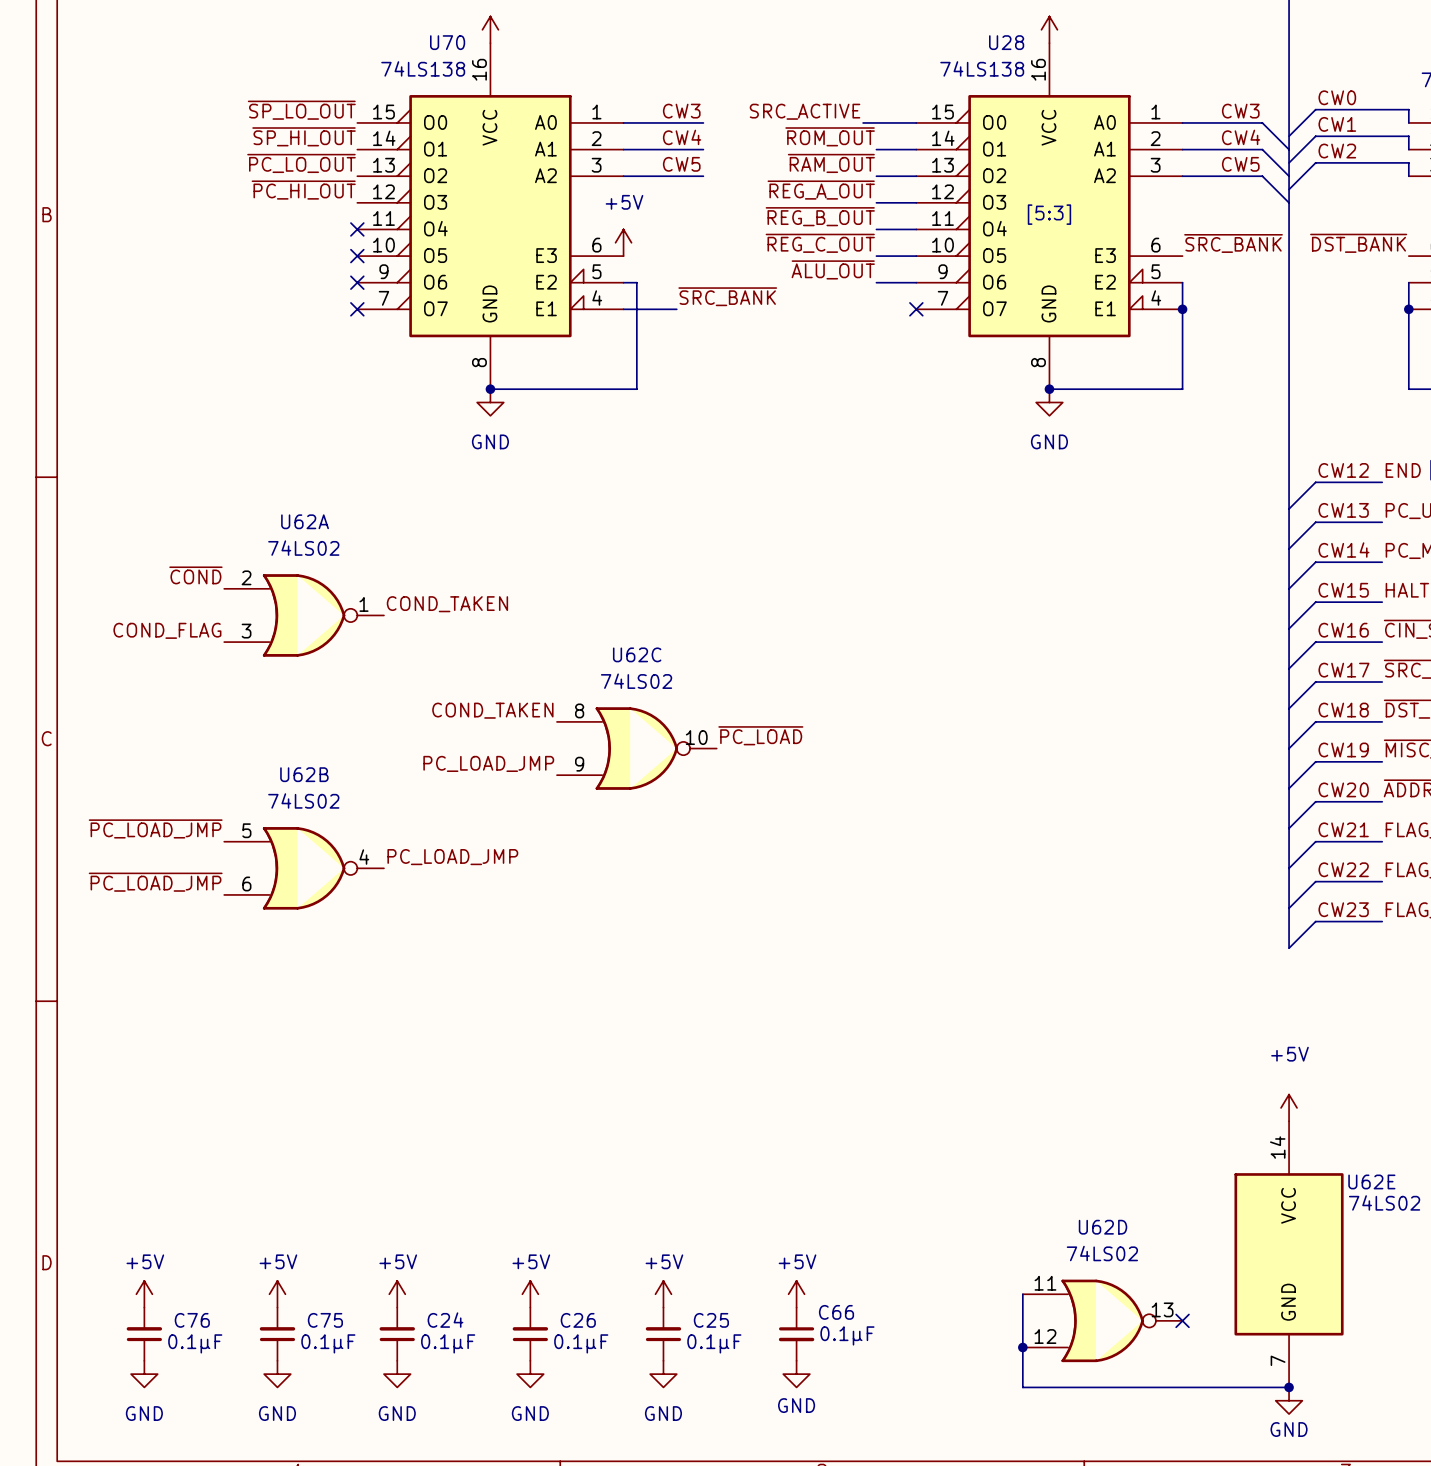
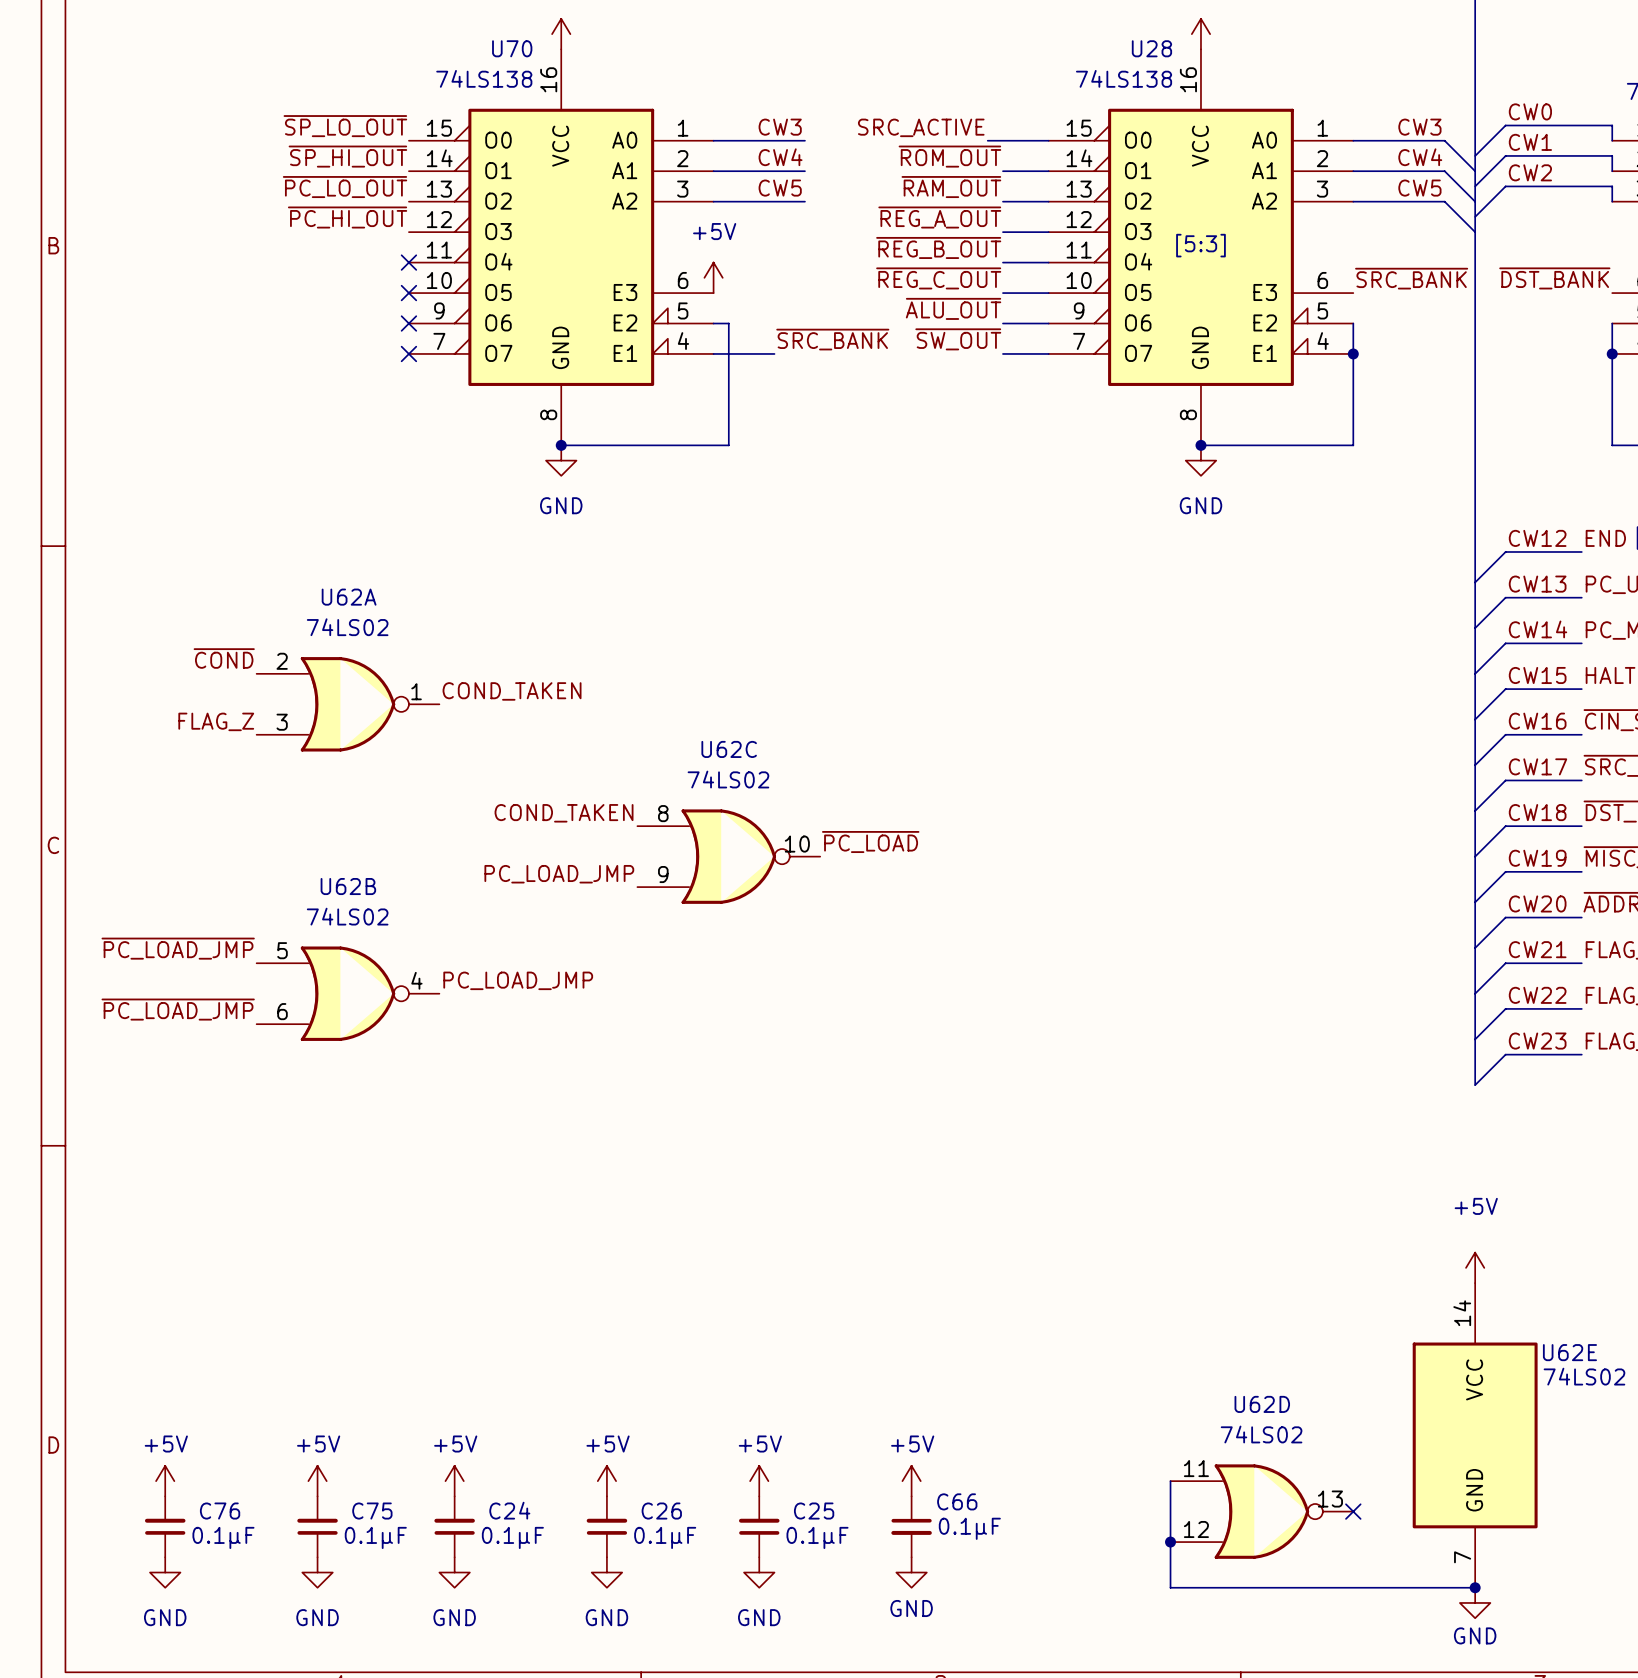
label: none -> ~{SW_OUT} (958, 339)
wire: none -> (1002, 353) (1048, 353)
no-connect mark: (916, 309) -> none
label: COND_FLAG (167, 630) -> FLAG_Z (216, 721)

